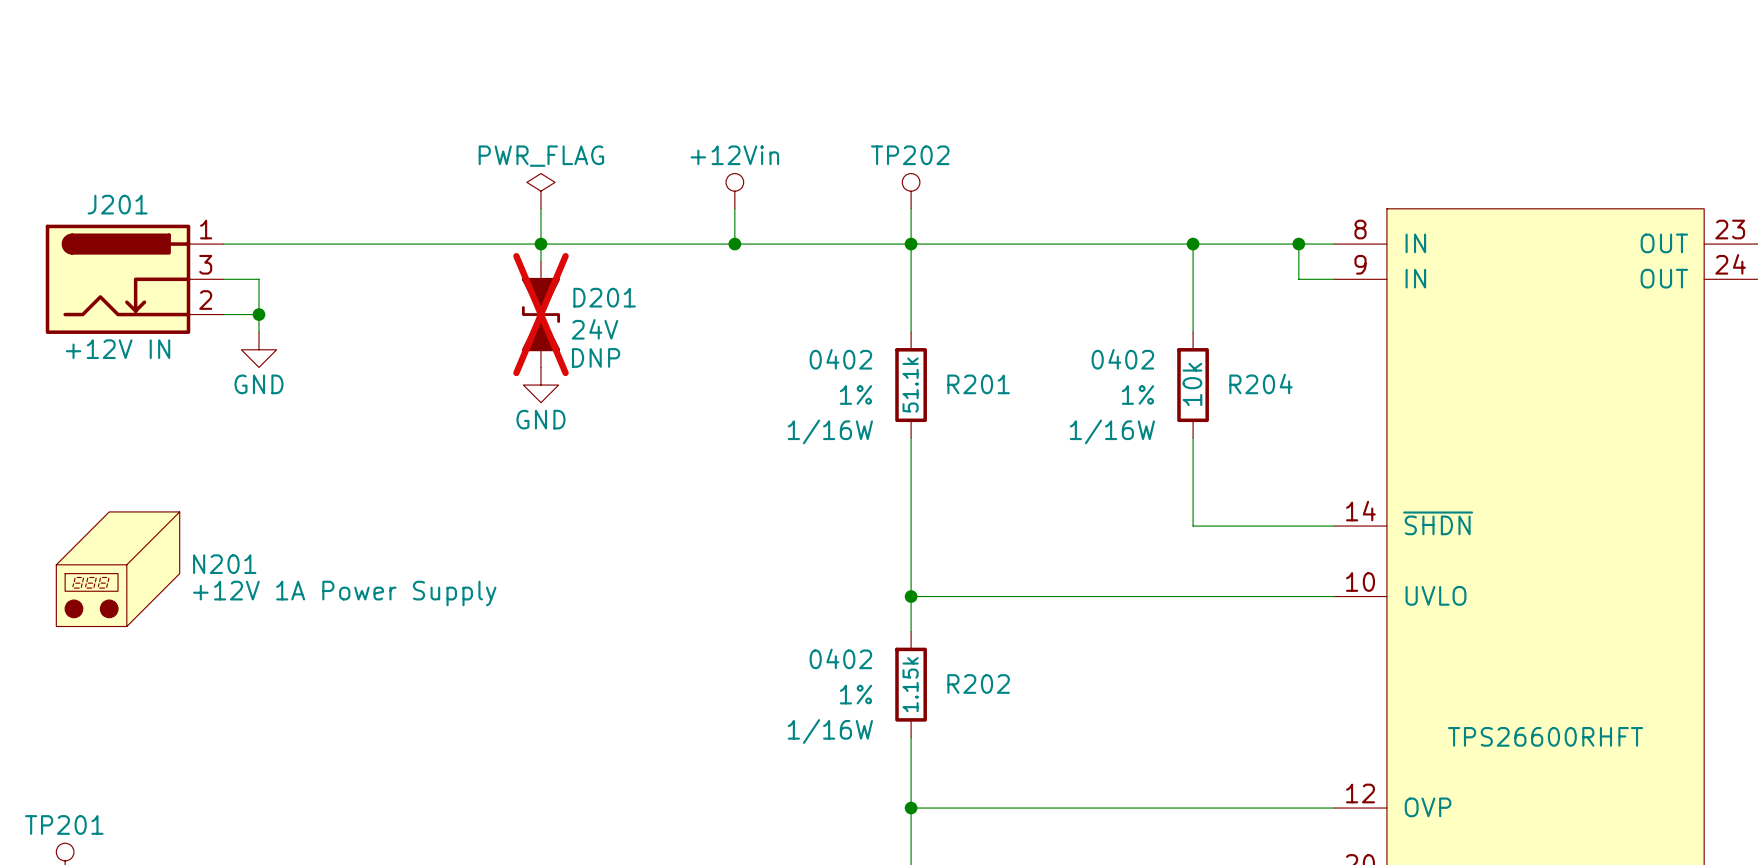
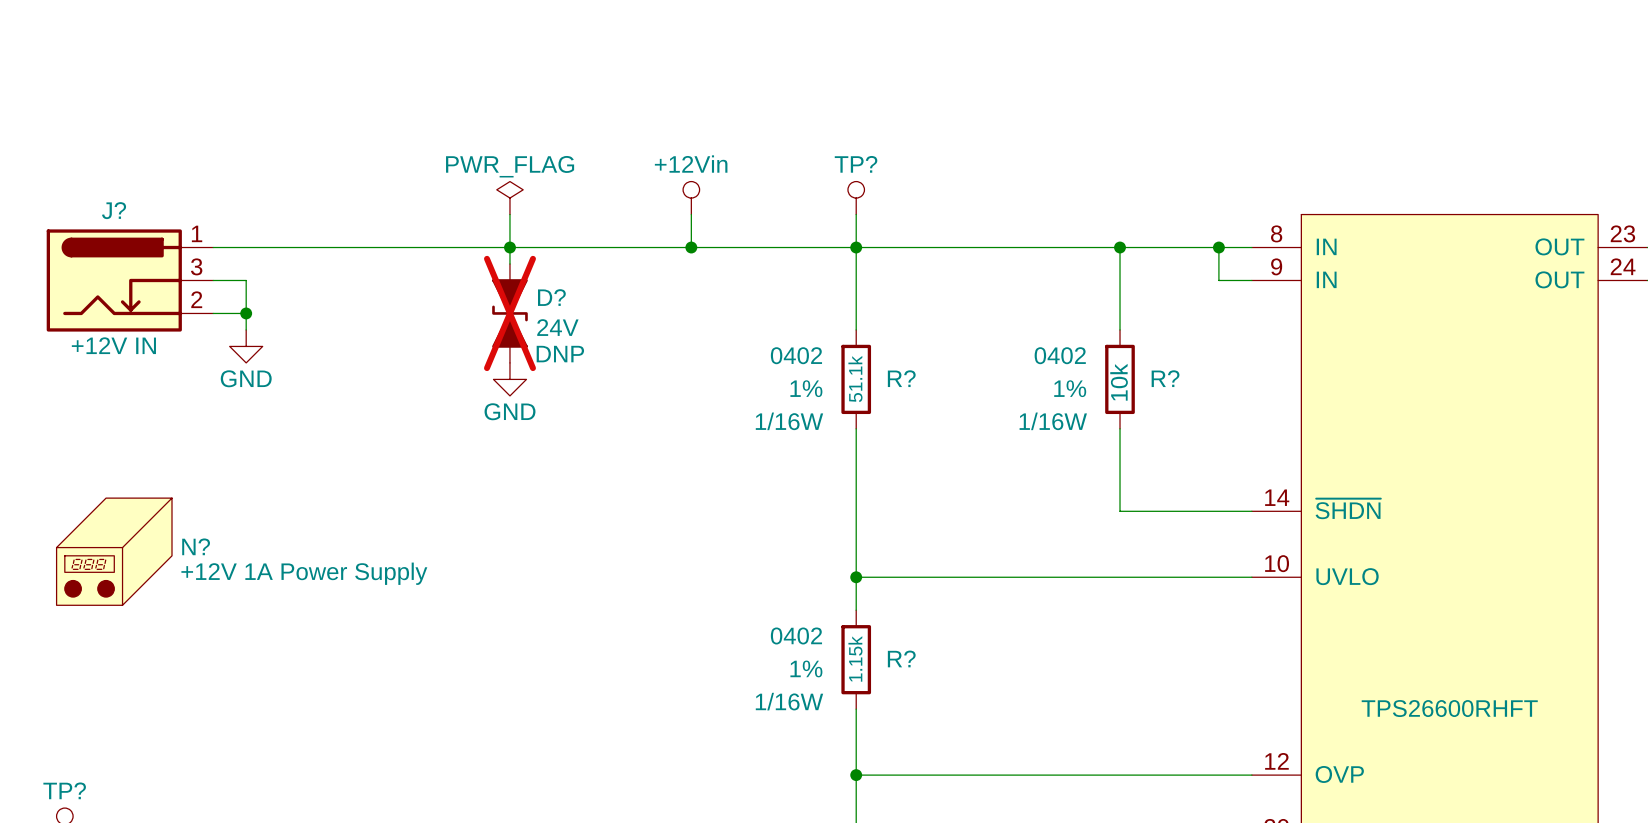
TP202 name: TP202 (910, 155) -> TP? (856, 164)
J201 name: J201 (117, 204) -> J? (114, 210)
D201 name: D201 (604, 297) -> D? (551, 297)
R204 name: R204 (1261, 383) -> R? (1165, 378)
R201 name: R201 (978, 384) -> R? (901, 378)
N201 name: N201 (224, 564) -> N? (196, 546)
R202 name: R202 (978, 684) -> R? (901, 658)
TP201 name: TP201 (64, 824) -> TP? (64, 790)

